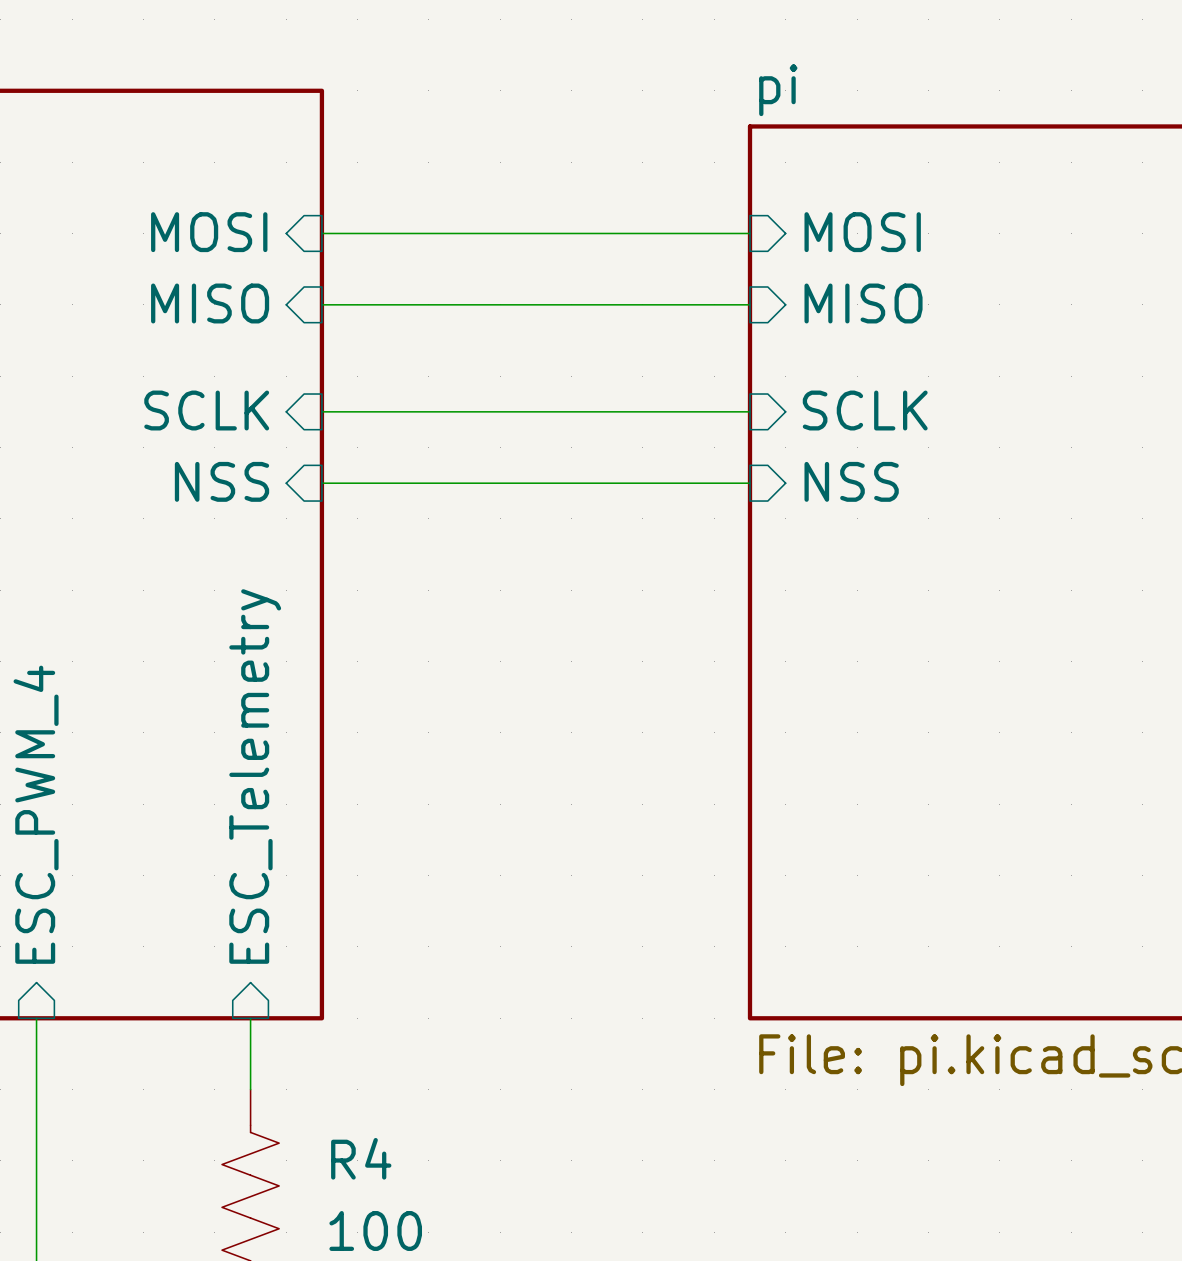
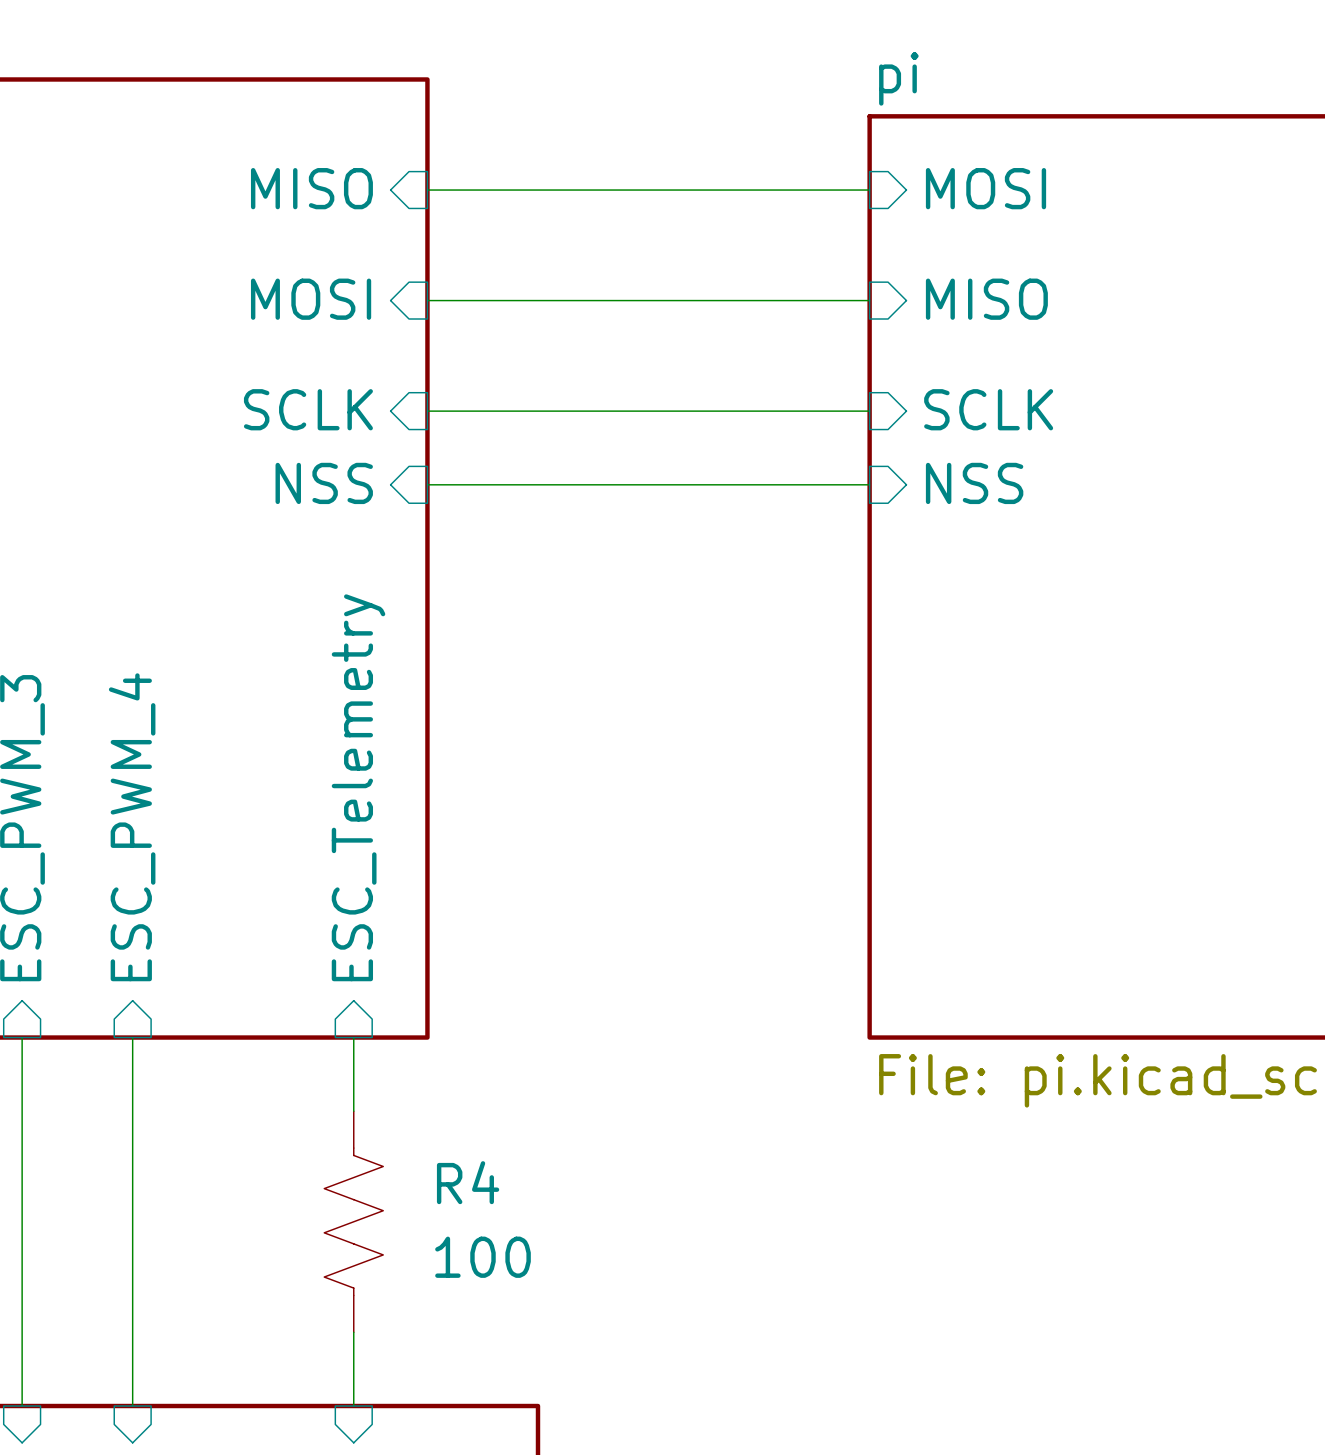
sheet pin: none -> MISO (311, 188)
sheet pin: MOSI (209, 232) -> none
sheet pin position: MOSI (862, 232) -> MOSI (986, 188)
wire: (321, 233) (750, 233) -> (427, 190) (869, 190)
sheet pin: MISO (210, 303) -> MOSI (311, 299)

